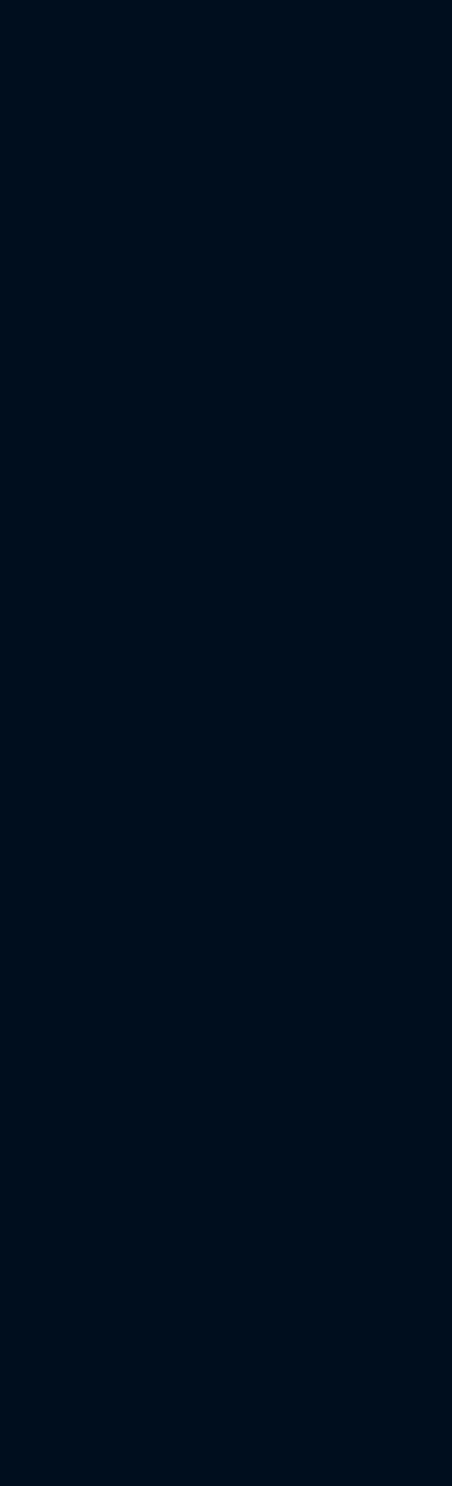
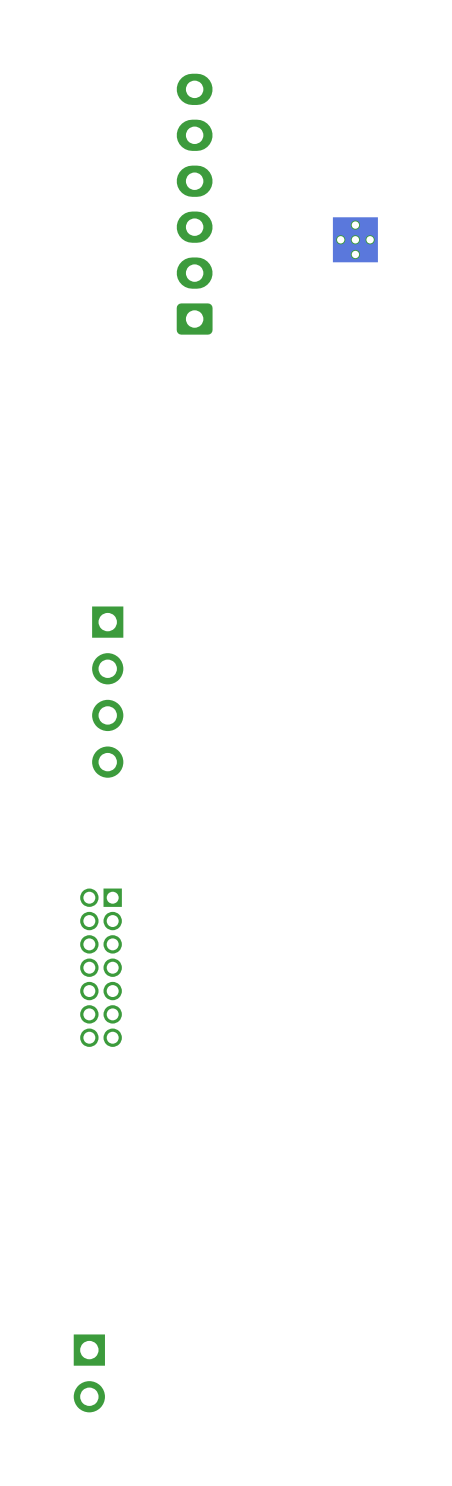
part: none -> (194, 204)
part: none -> (355, 239)
part: none -> (107, 692)
part: none -> (101, 967)
part: none -> (89, 1373)

